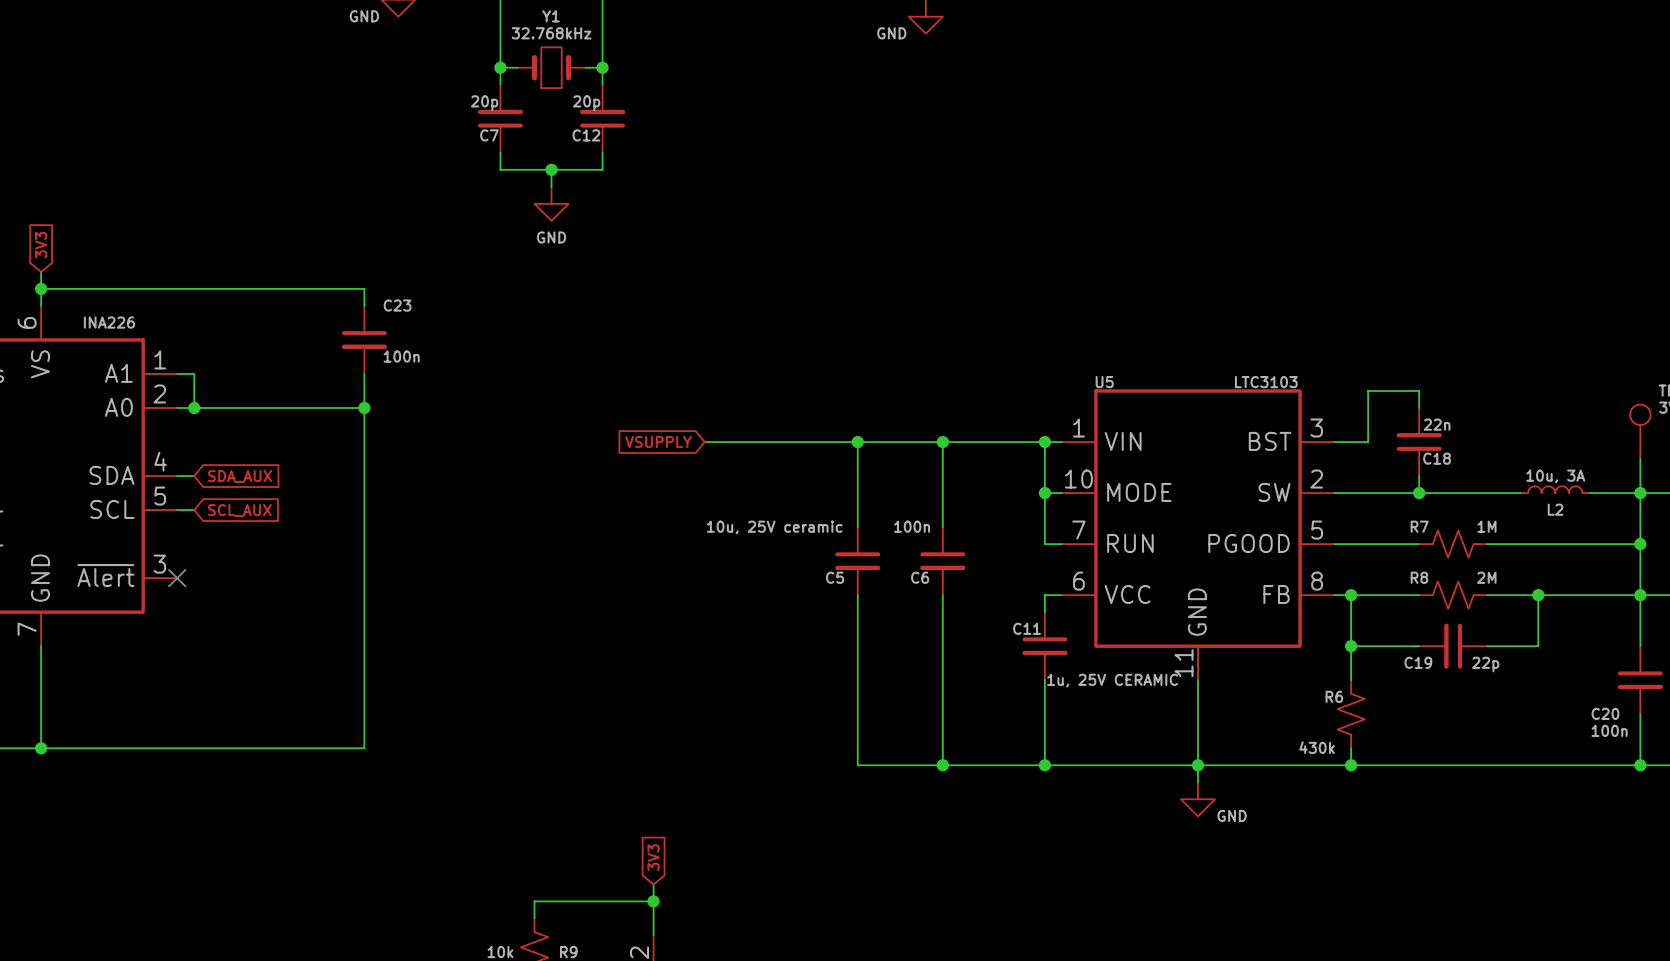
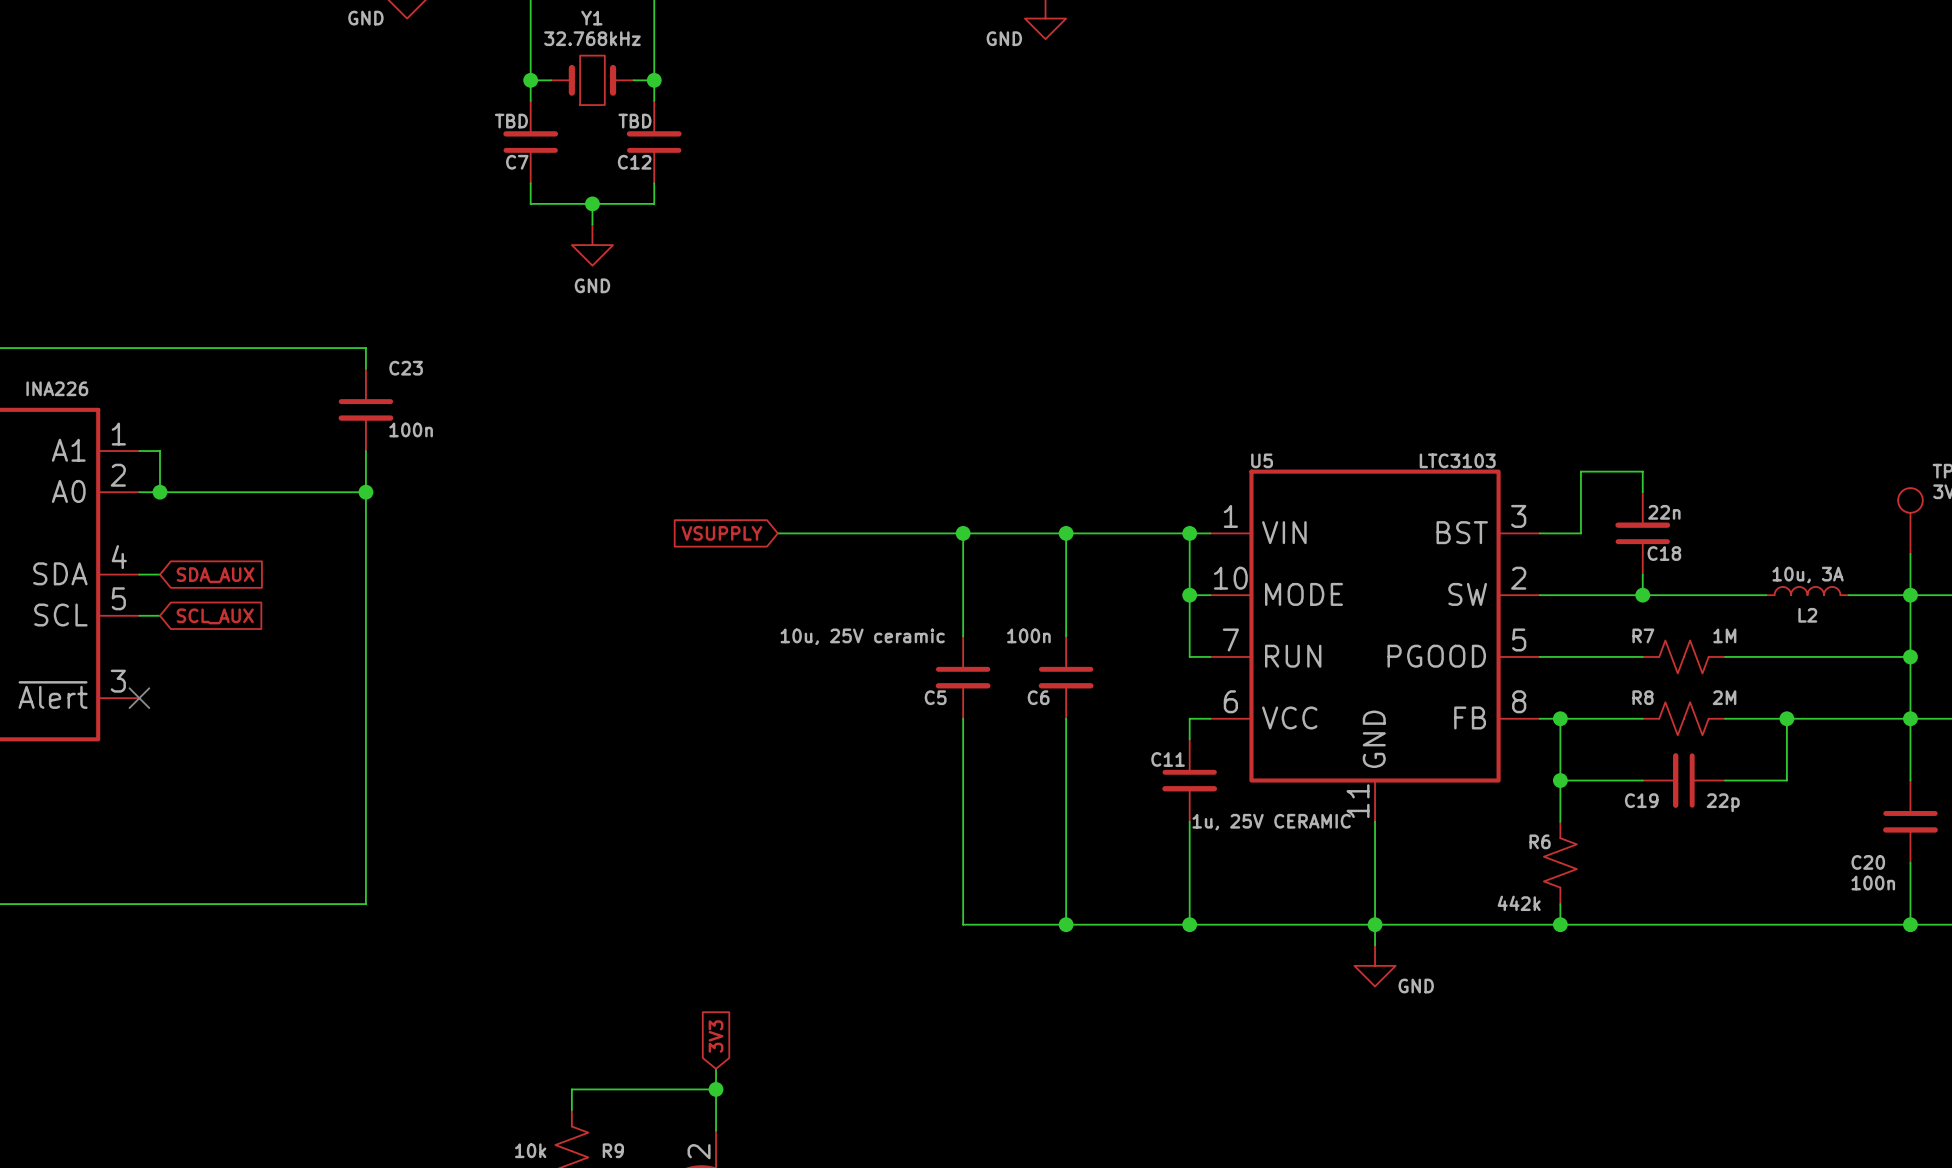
C7 value: 20p (484, 103) -> TBD (511, 121)
C12 value: 20p (586, 103) -> TBD (634, 121)
R6 value: 430k (1317, 747) -> 442k (1519, 903)

